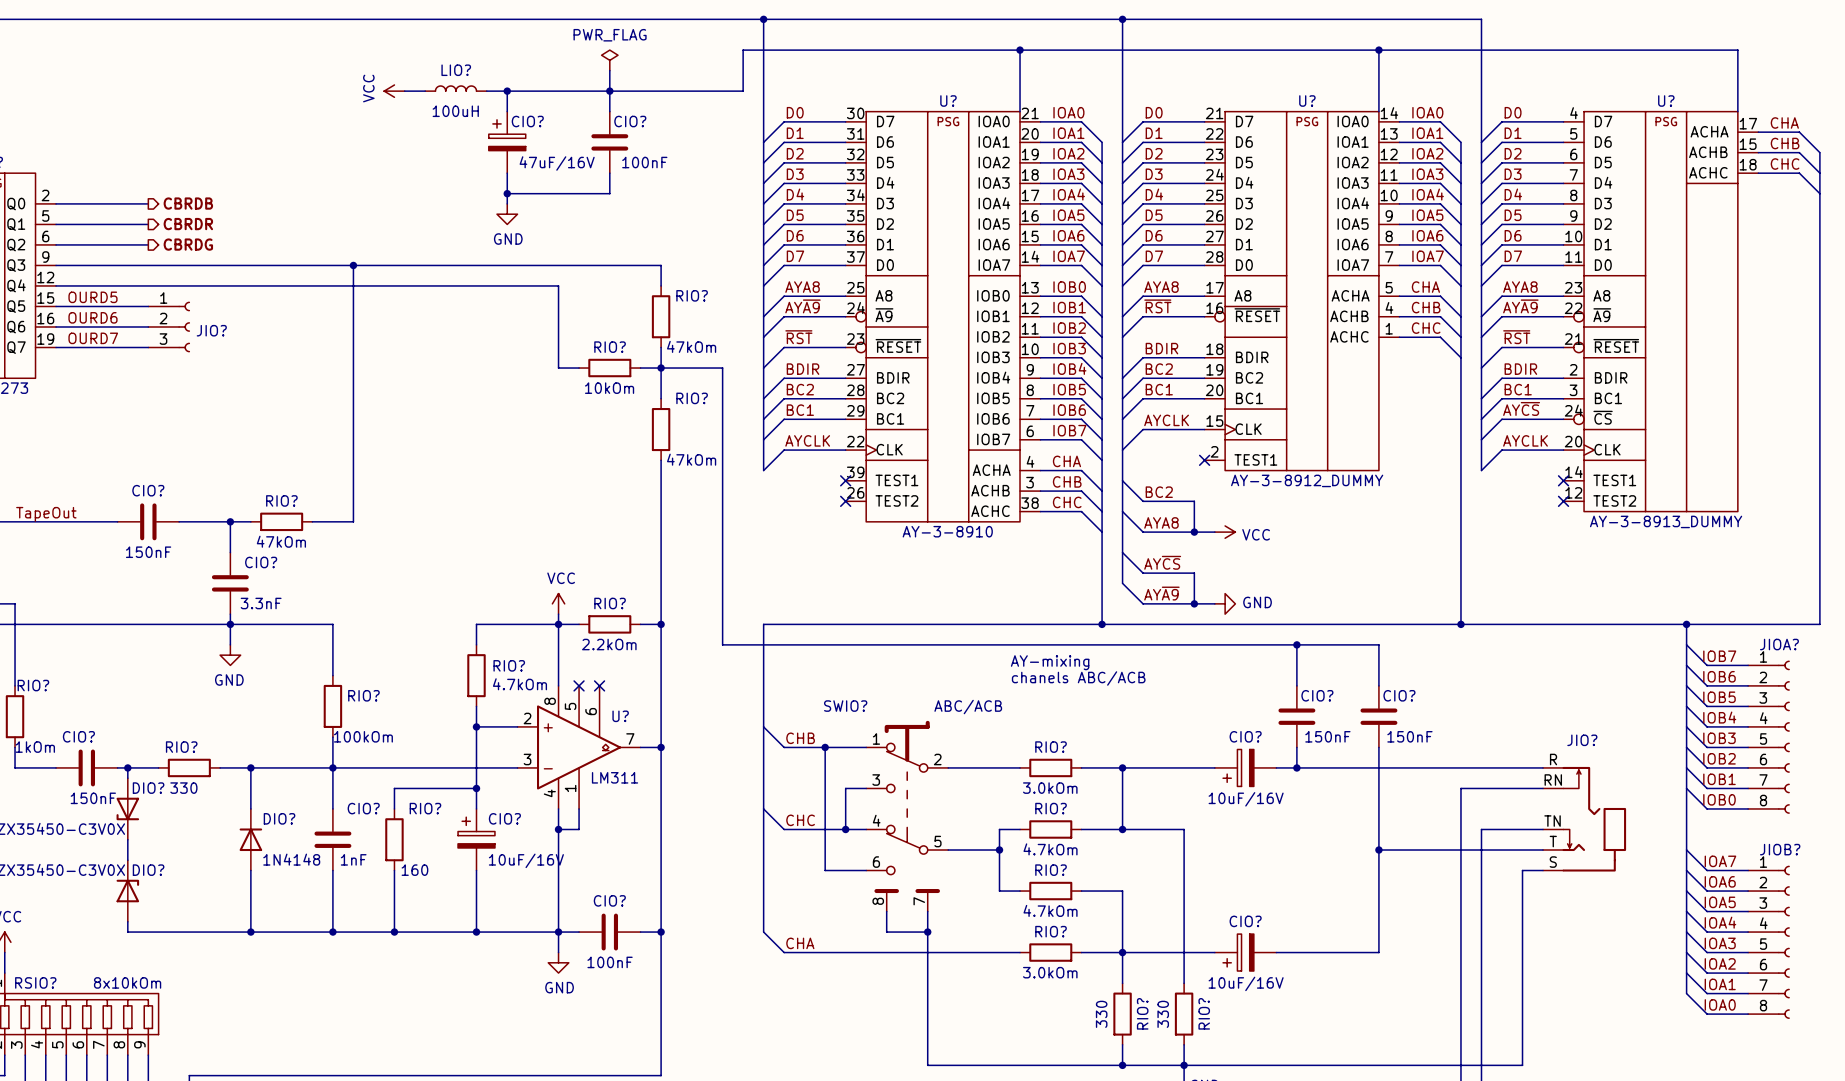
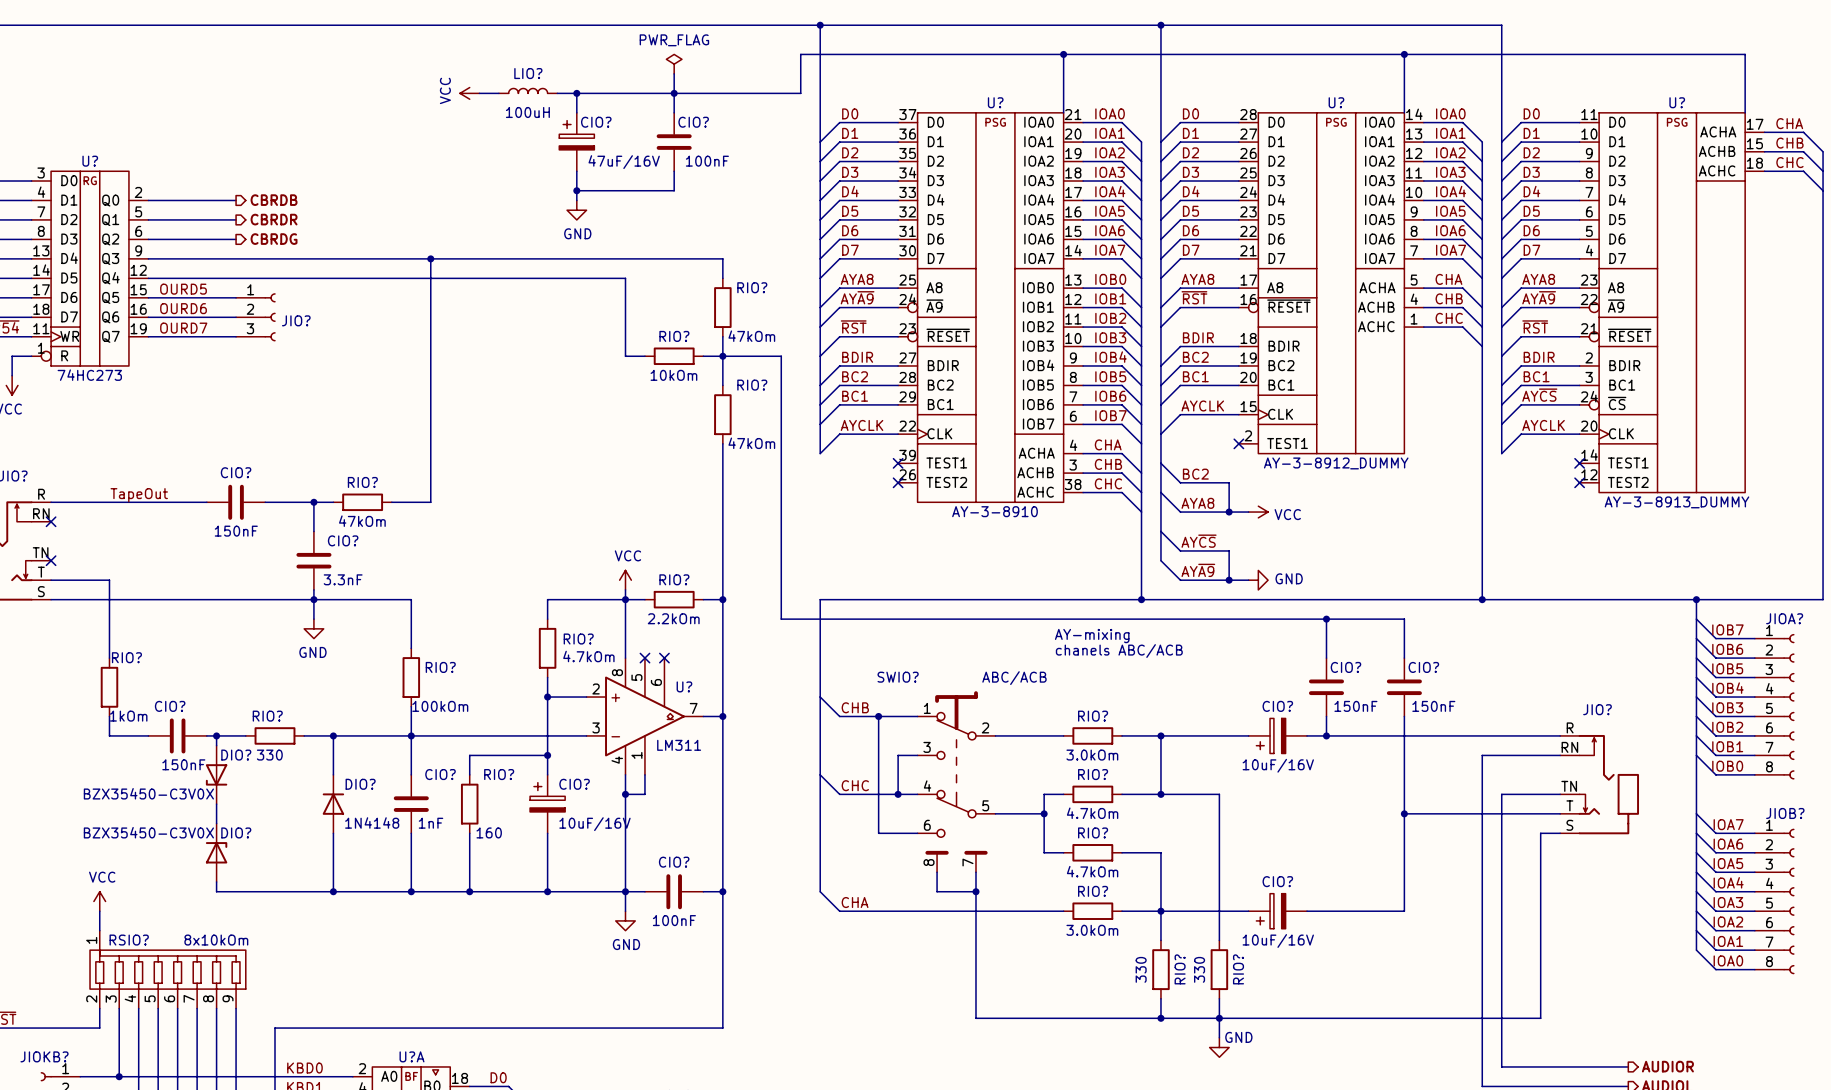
U? symbol: [845, 111, 1041, 522] -> [898, 112, 1084, 503]
U? symbol: [1204, 111, 1400, 471] -> [1238, 112, 1424, 454]
U? symbol: [1563, 111, 1759, 512] -> [1579, 112, 1765, 493]

